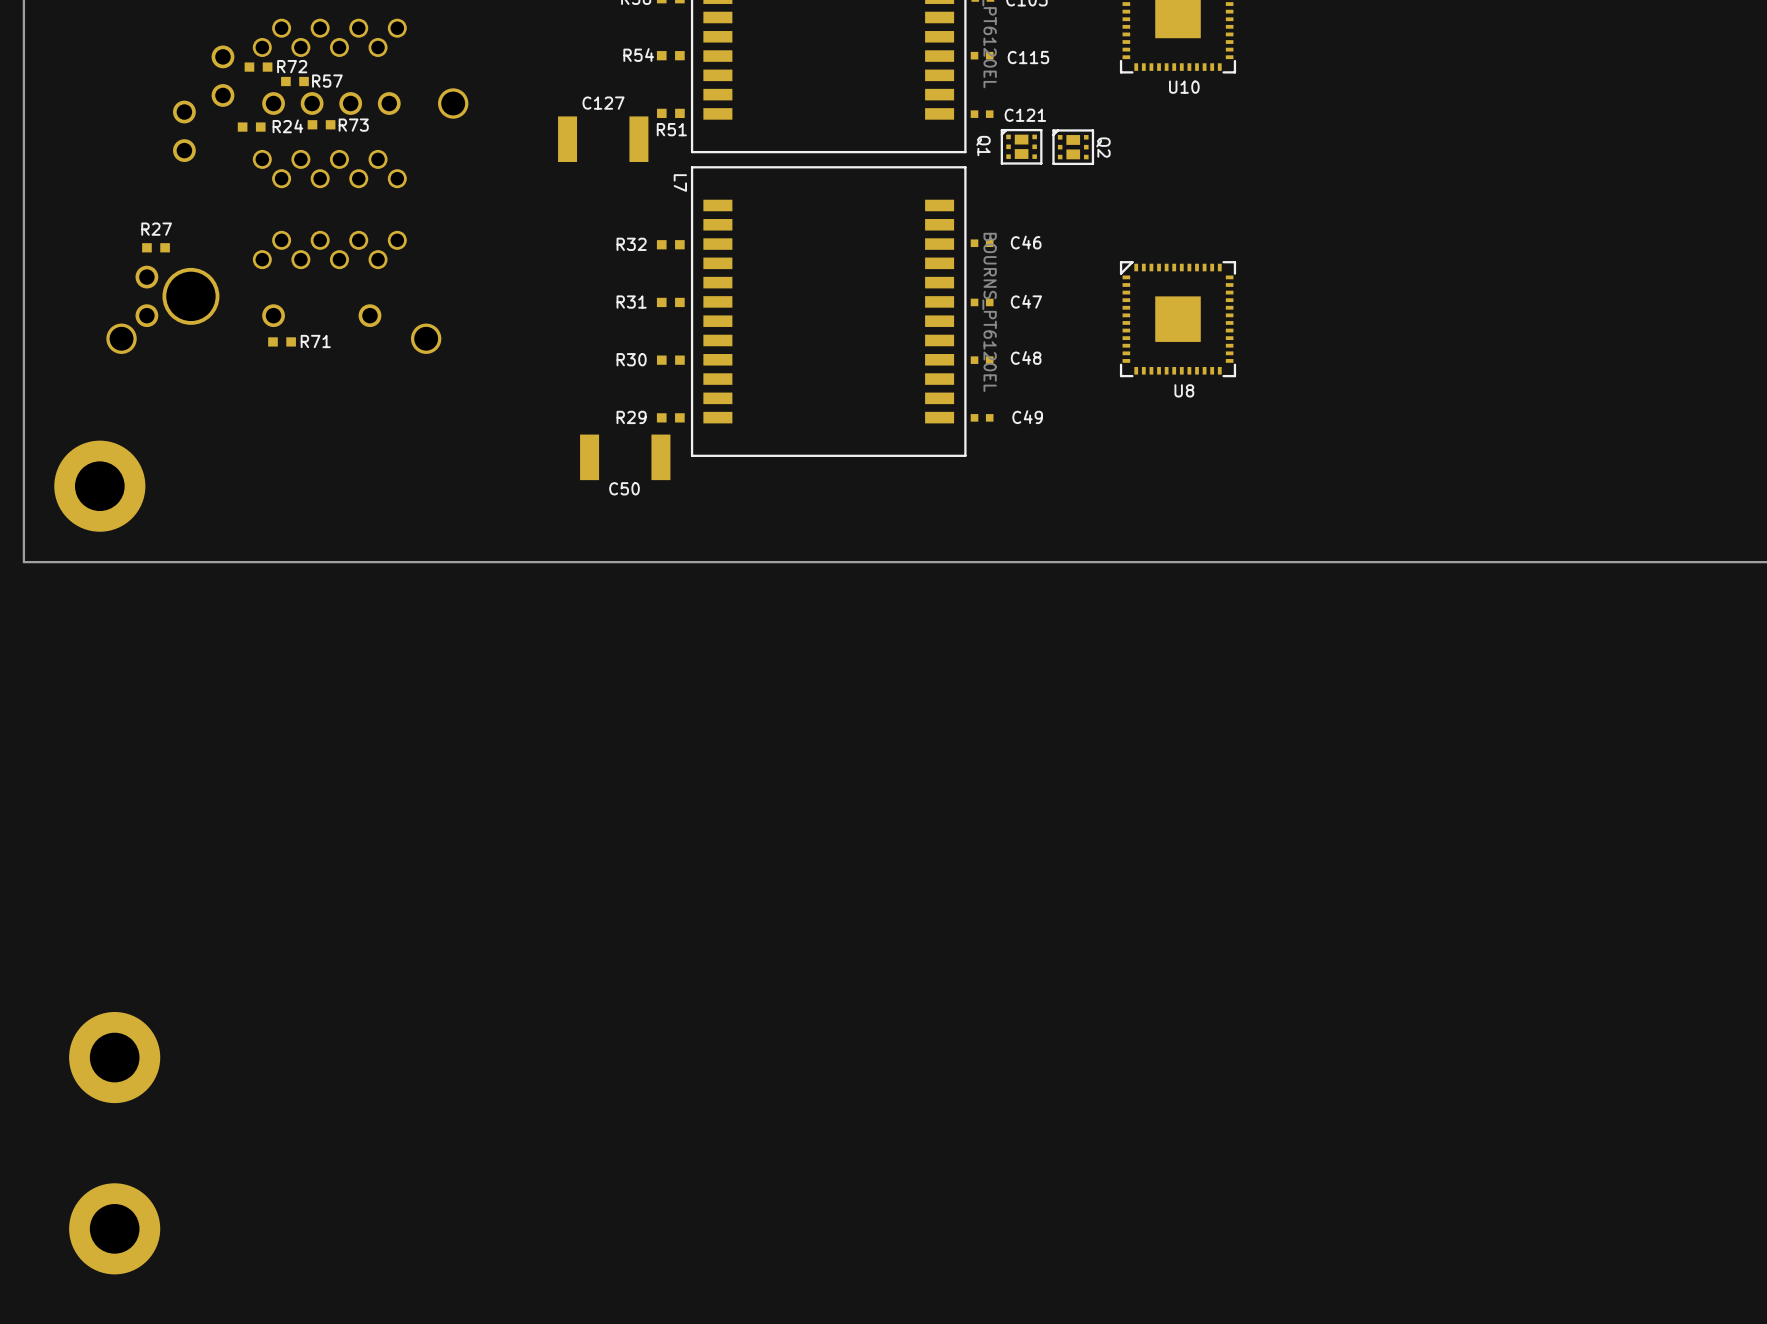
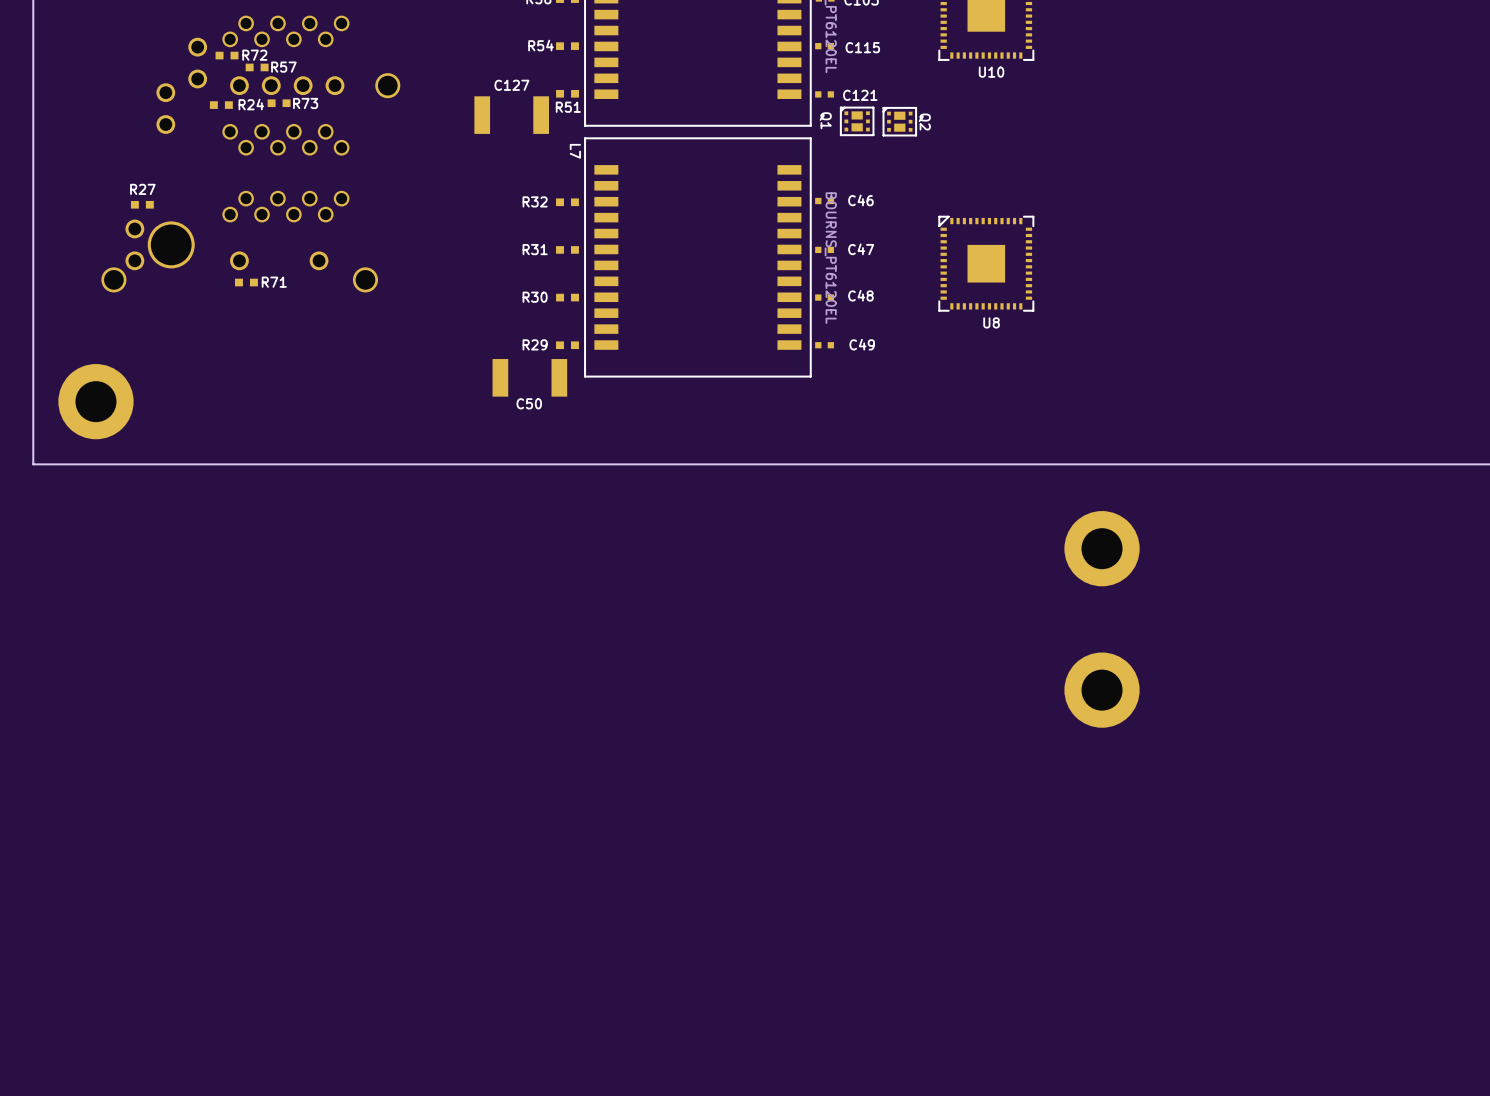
part: none -> (1102, 548)
part: none -> (1102, 690)
part: (114, 1057) -> none
part: (114, 1228) -> none

